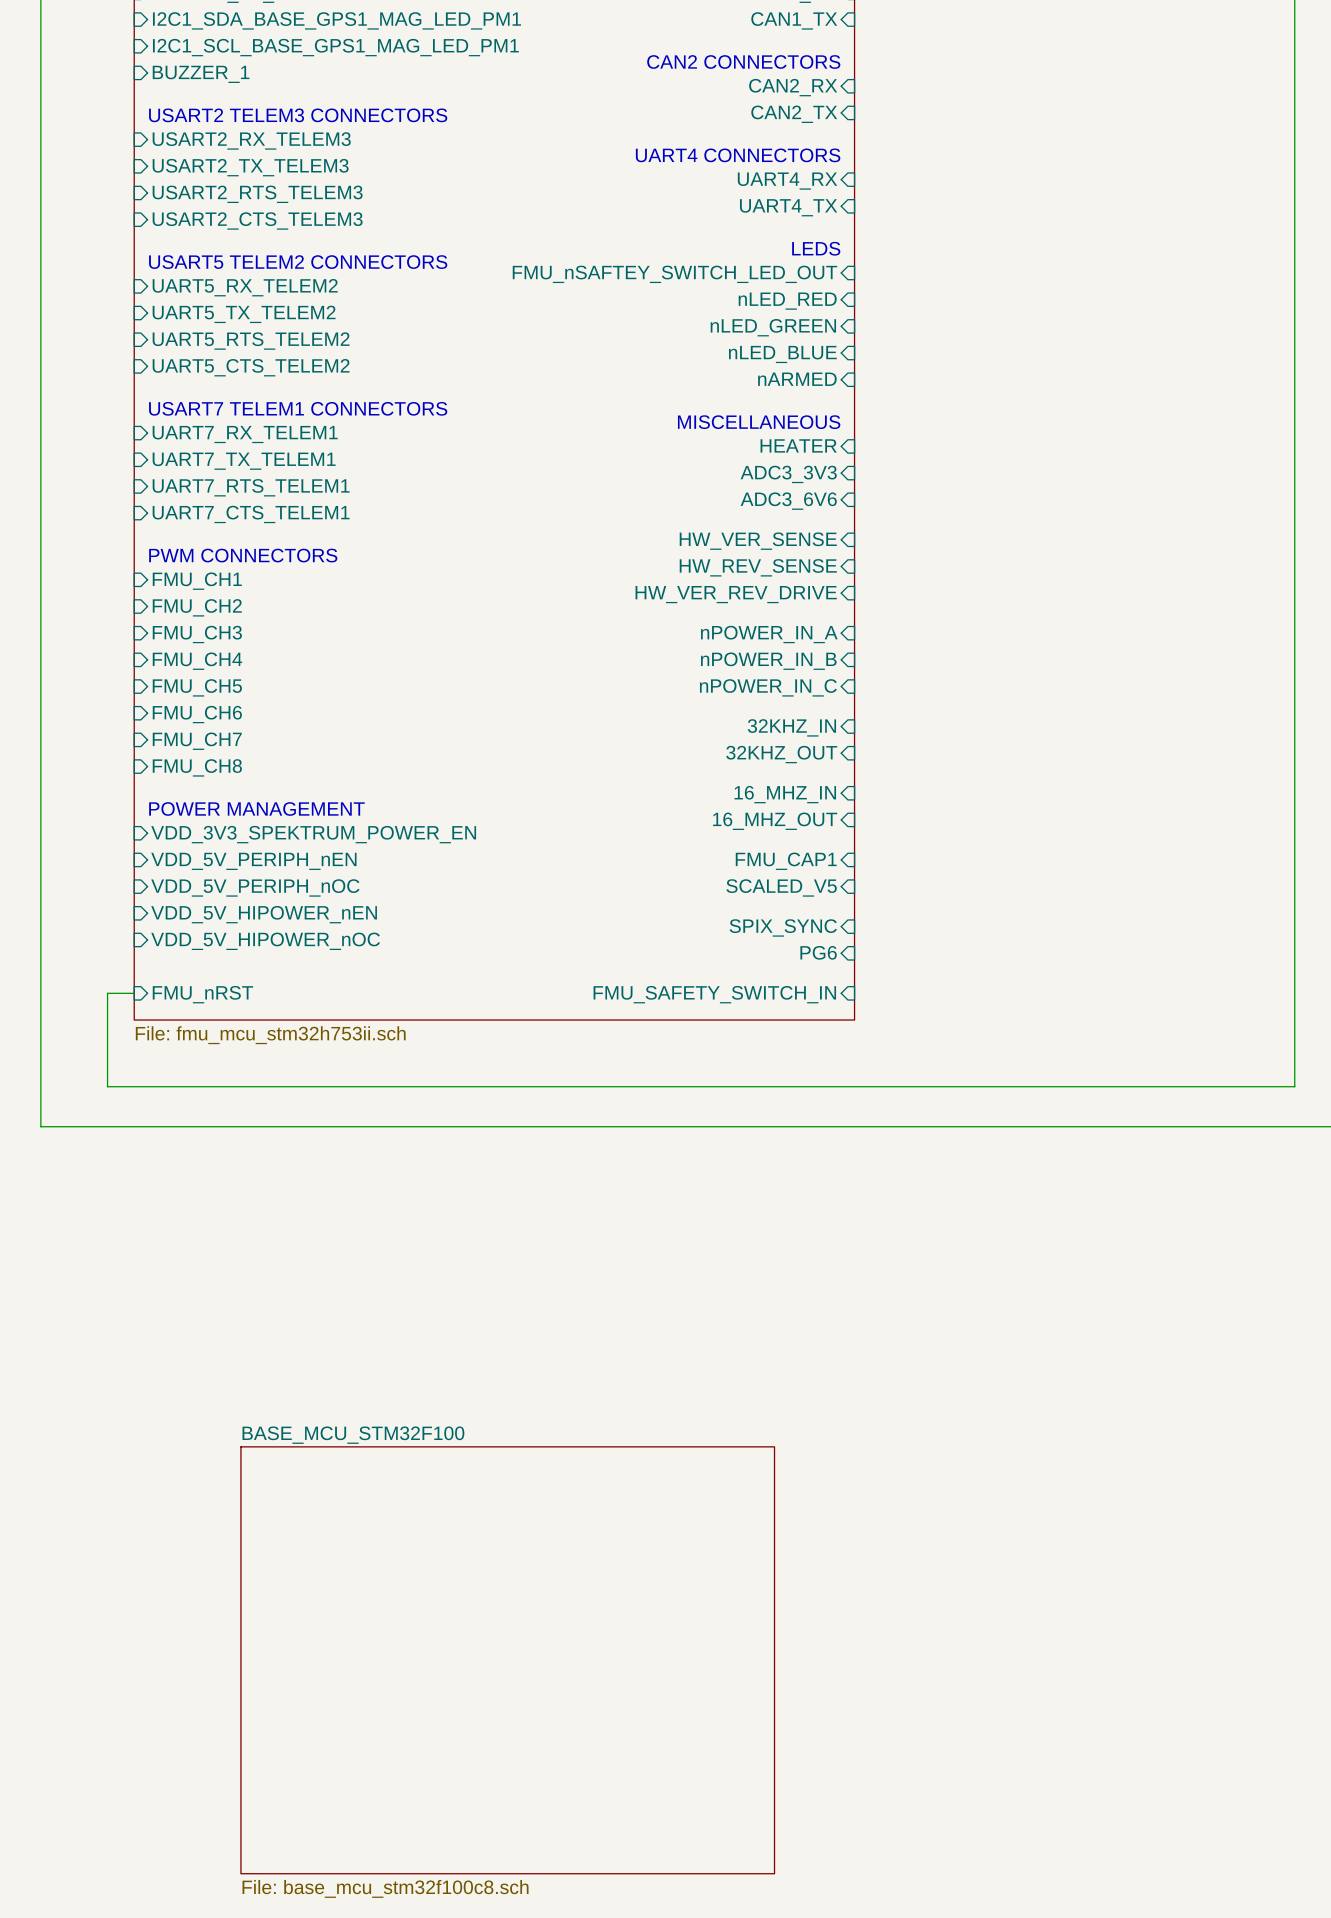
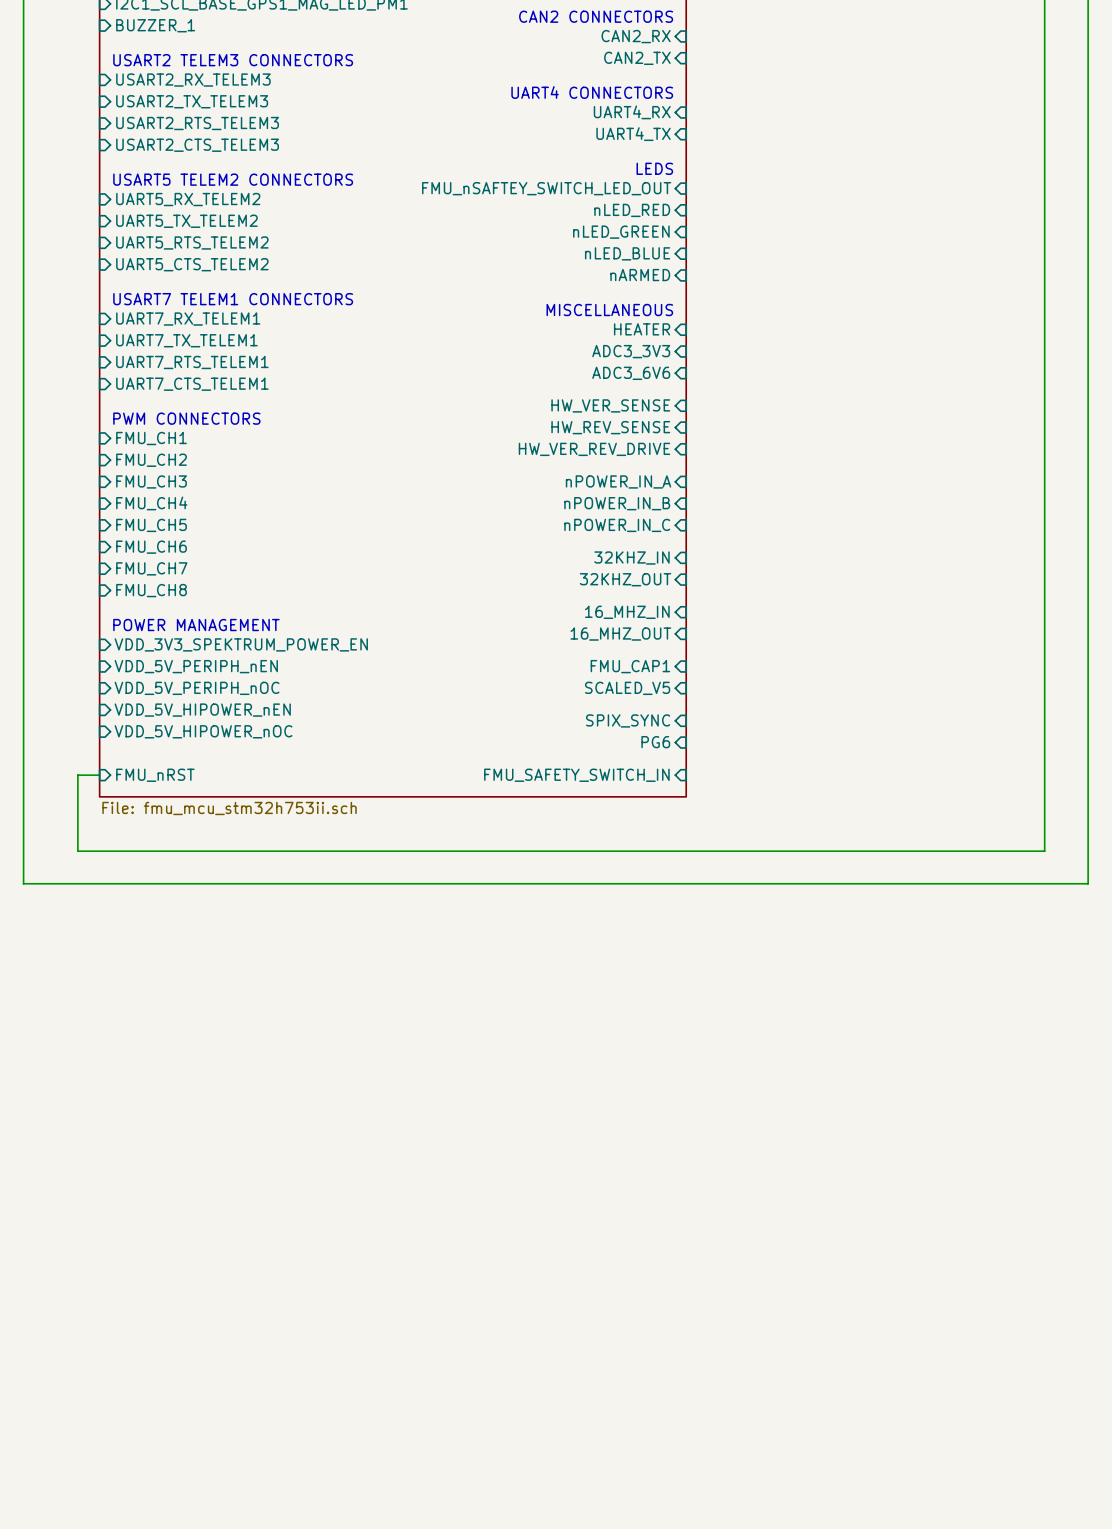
sheet BASE_MCU_STM32F100: File: base_mcu_stm32f100c8.sch (507, 1660) -> none

